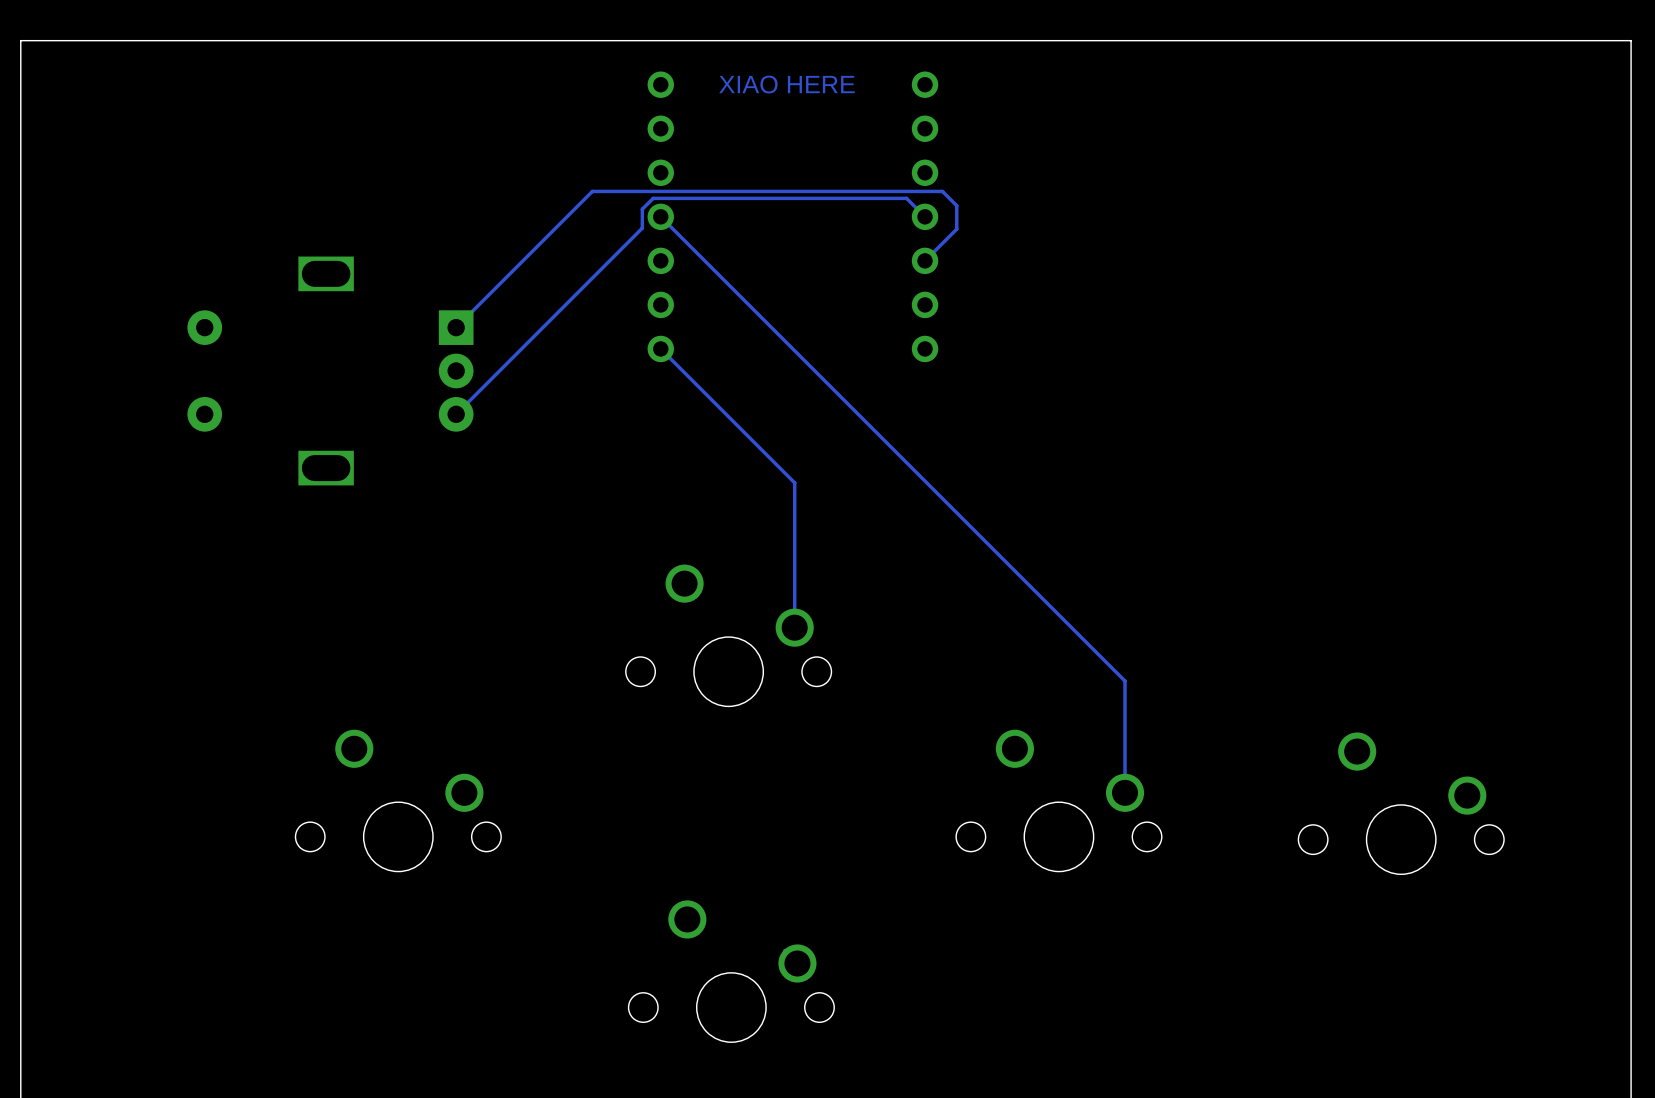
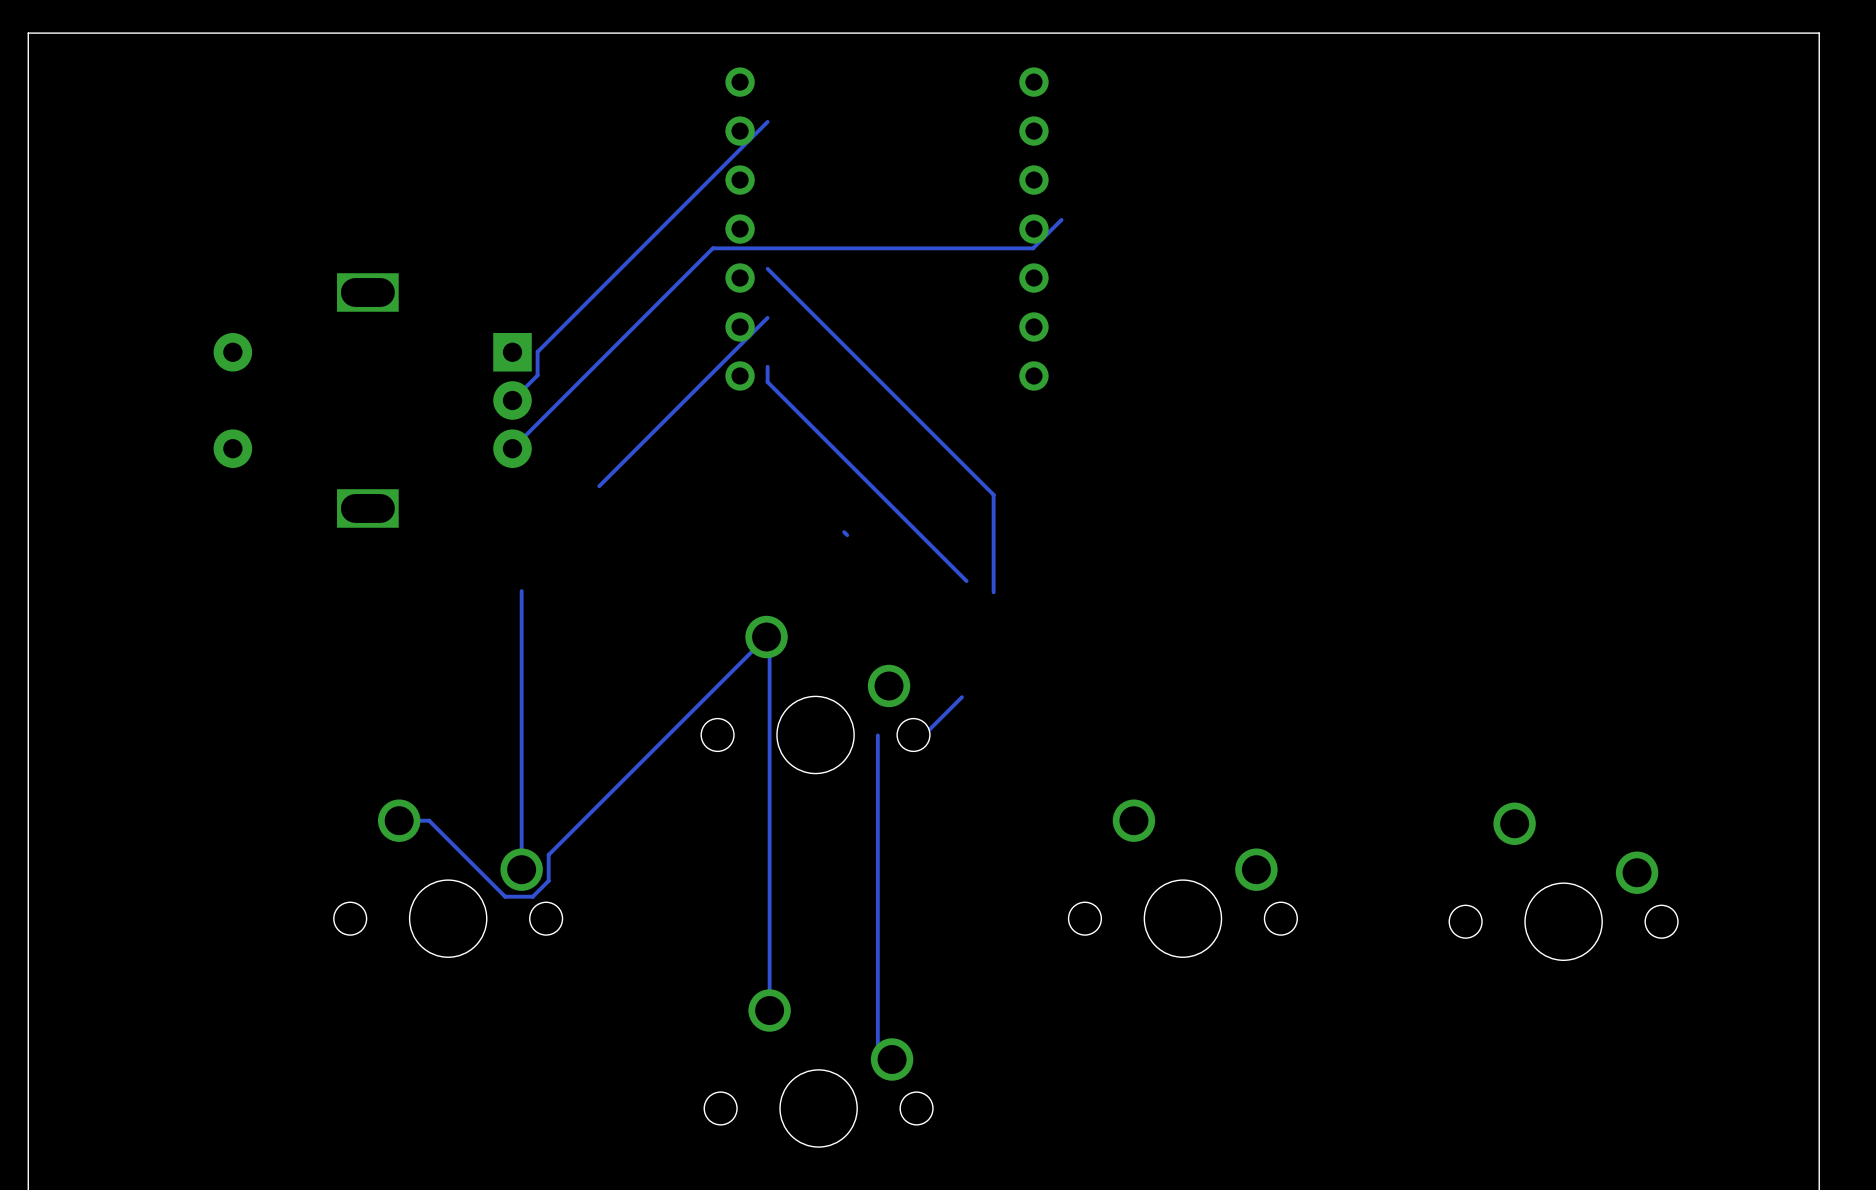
text: XIAO HERE (786, 84) -> none
track: none -> (767, 121) (537, 351) (537, 375) (512, 400)
track: (660, 216) (1125, 681) (1125, 792) -> none
track: (925, 216) (906, 198) (653, 198) (642, 209) (642, 228) (636, 234) -> (1061, 219) (1033, 248) (712, 248)
track: none -> (767, 268) (993, 494) (993, 592)
track: (925, 260) (956, 229) (956, 205) (942, 191) (592, 191) (456, 327) -> none
track: none -> (767, 317) (599, 486)
track: none -> (767, 366) (767, 382) (966, 581)
track: (660, 348) (794, 482) (794, 627) -> none
track: none -> (844, 532) (847, 535)
track: none -> (521, 591) (521, 869)
track: none -> (766, 637) (548, 854) (548, 880) (532, 896) (505, 896) (429, 820) (399, 820)
track: none -> (769, 640) (769, 1010)
track: none -> (961, 697) (923, 735)
track: none -> (877, 735) (877, 1045)

